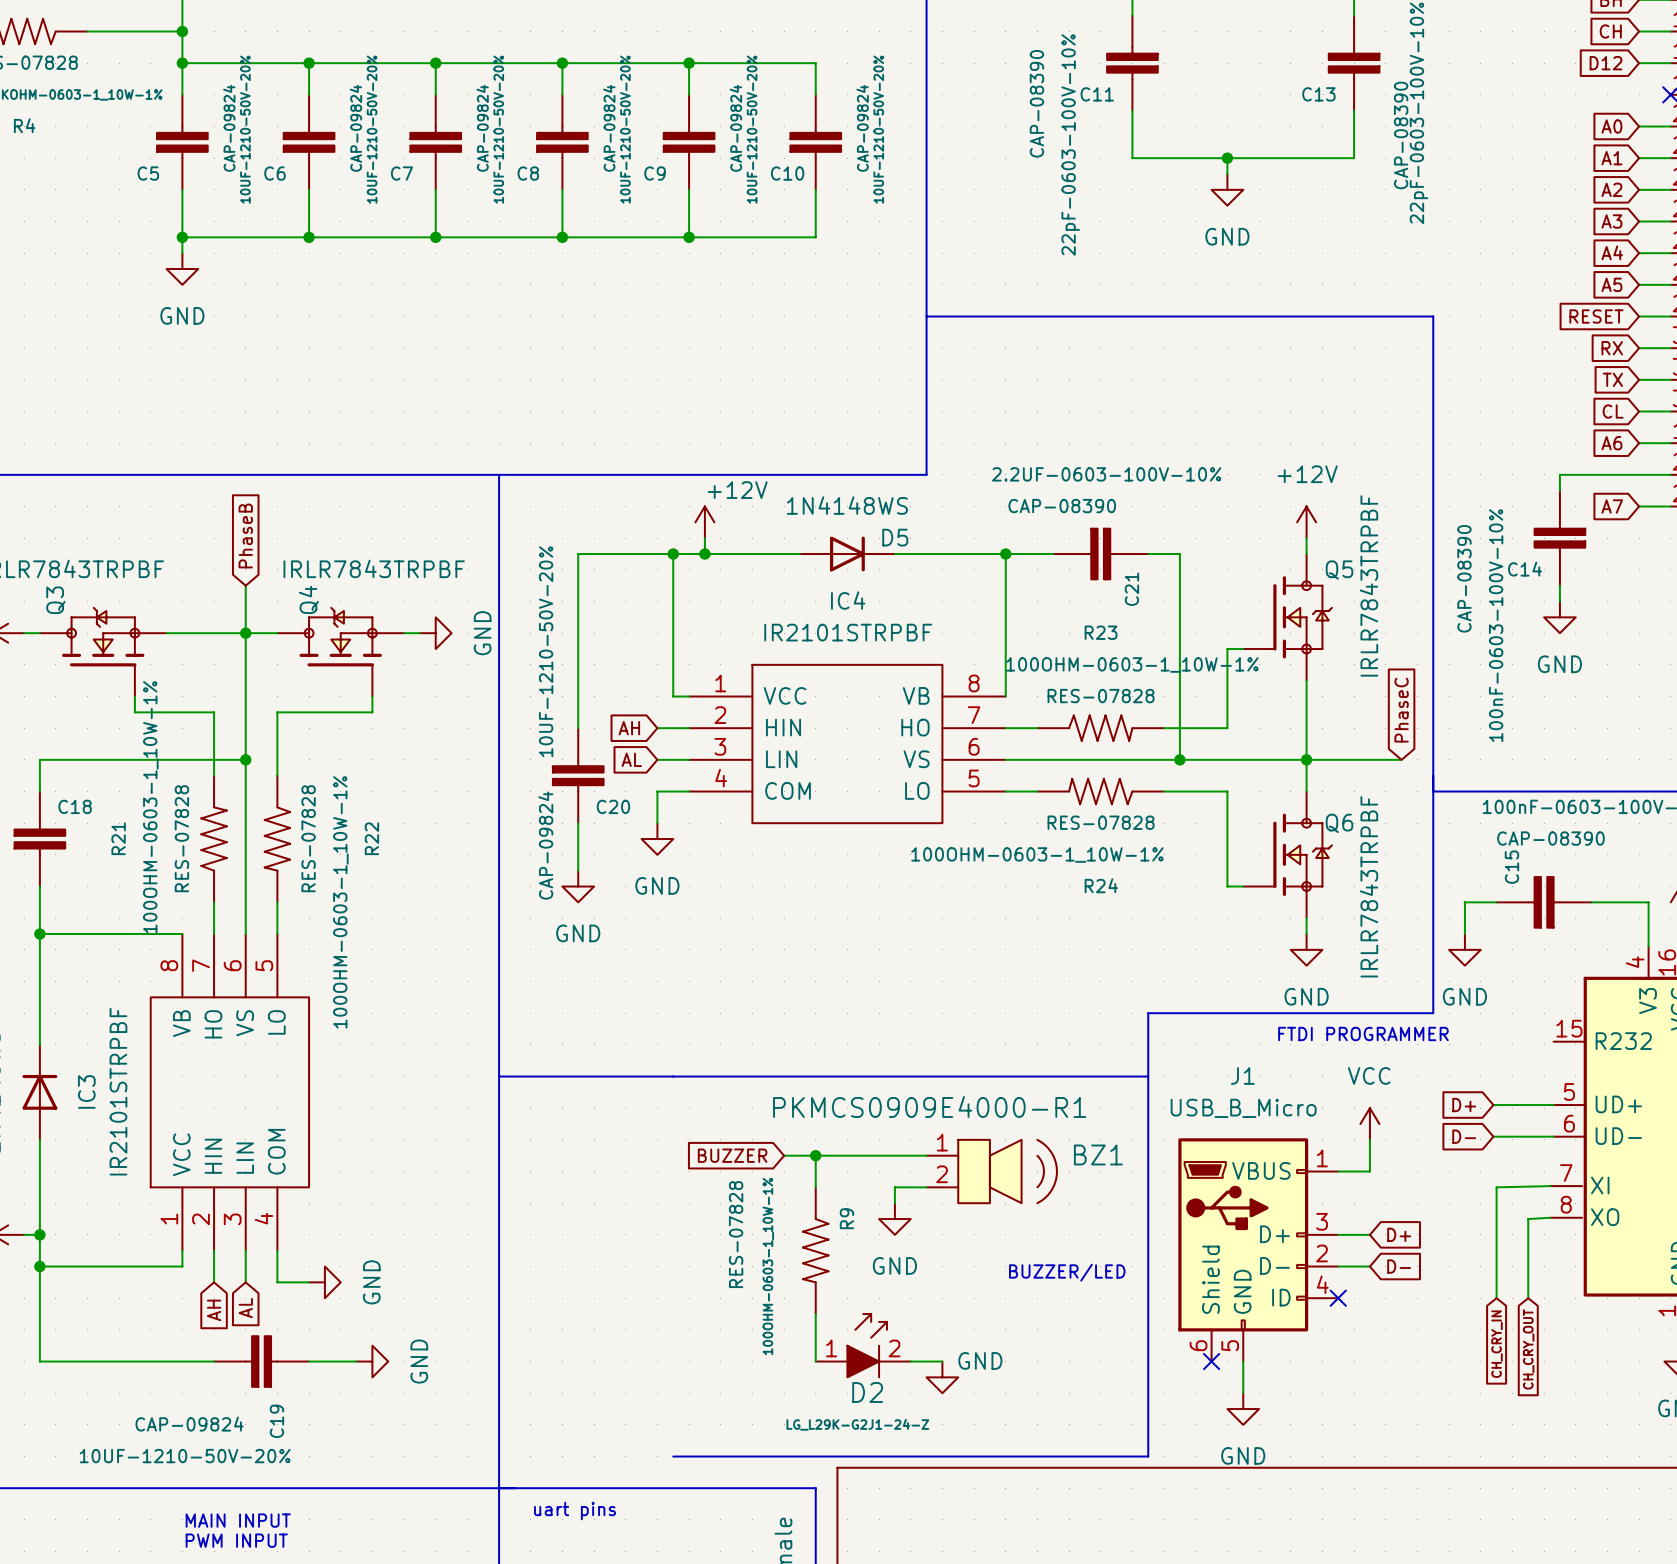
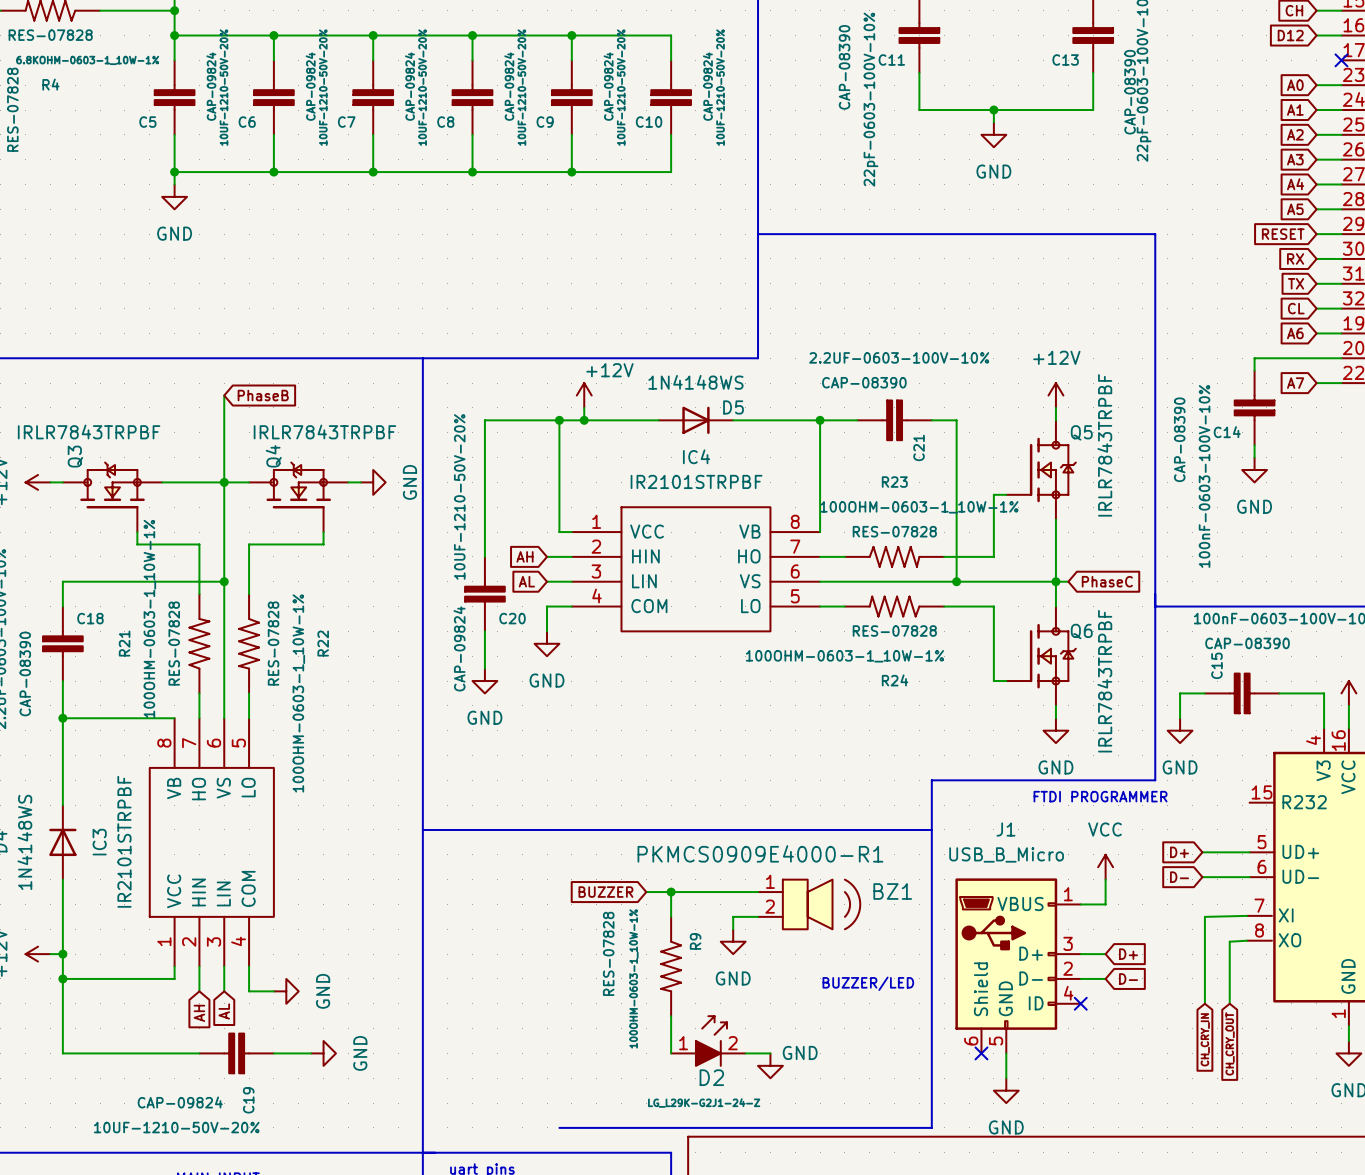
wire: none -> (224, 395) (224, 445)
global label rotation: 0° (245, 535) -> 90° clockwise (263, 395)
global label rotation: 0° (1401, 710) -> 90° clockwise (1107, 581)
wire: (1322, 759) (1401, 759) -> none

